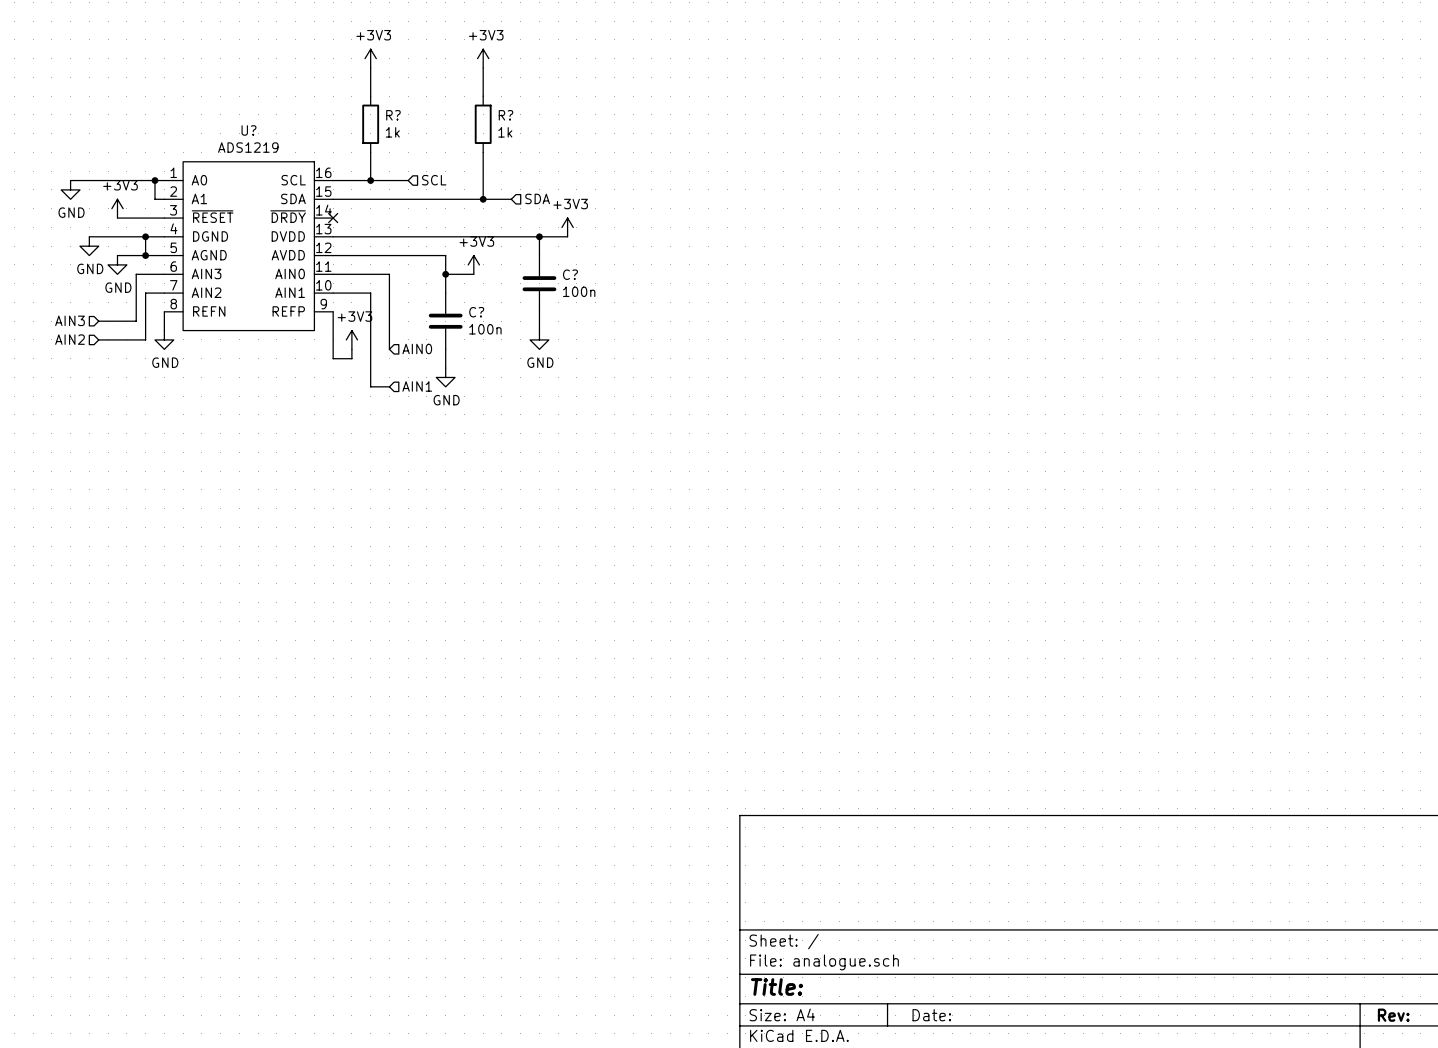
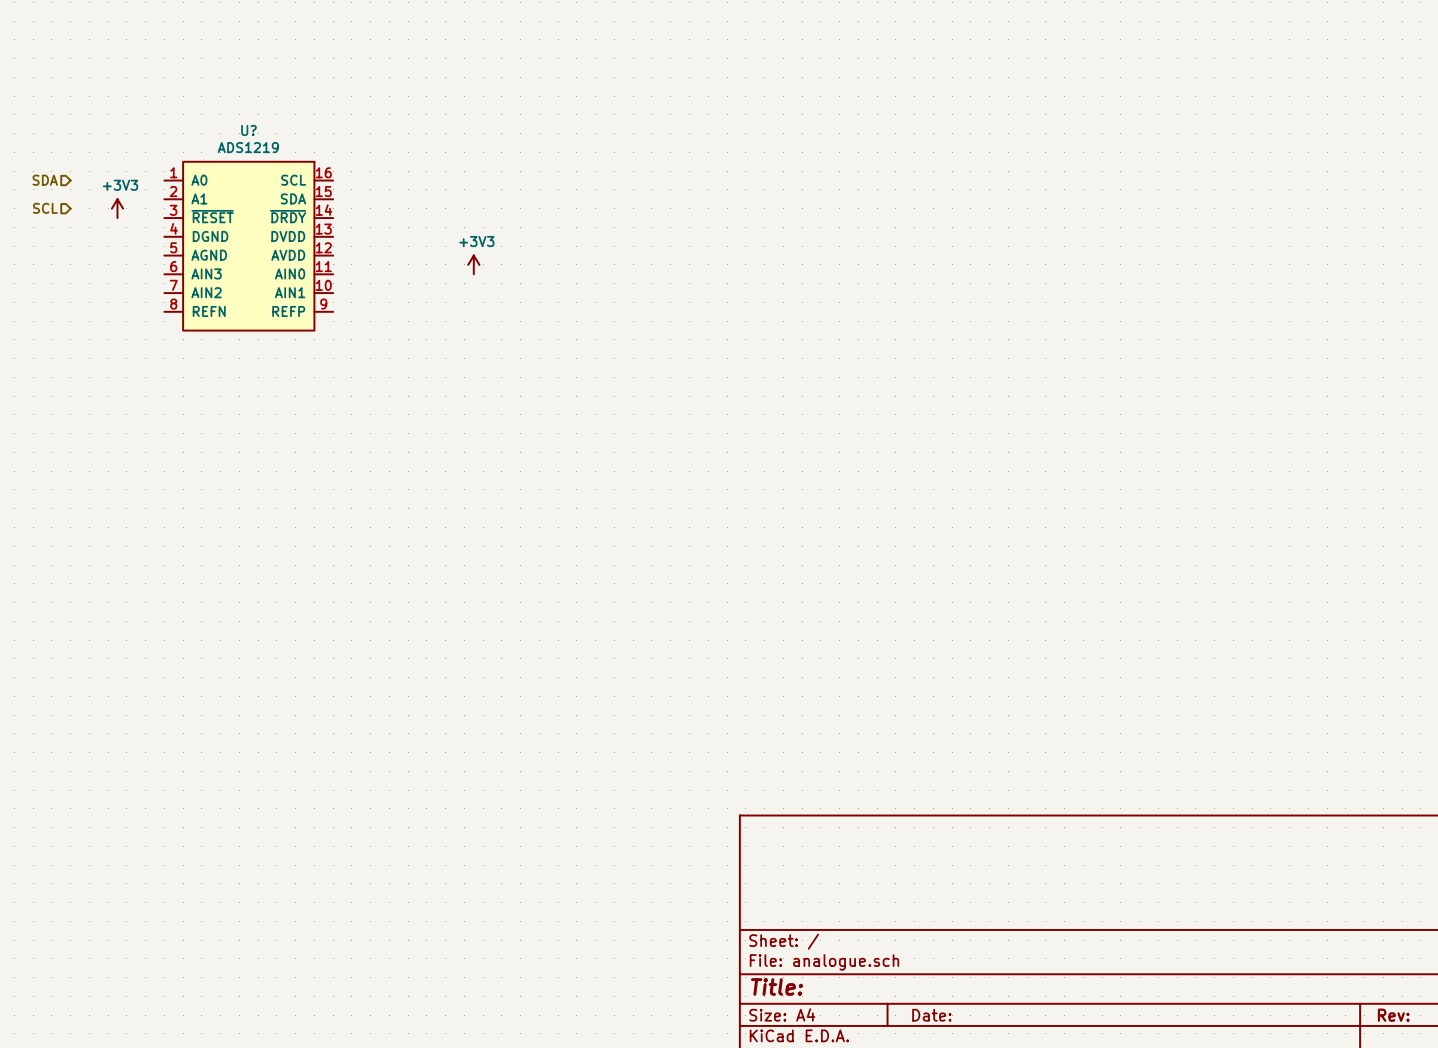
power symbol: +3V3 (370, 58) -> none
power symbol: +3V3 (483, 58) -> none
wire: (370, 68) (370, 96) -> none
wire: (483, 68) (483, 96) -> none
R?: 1k (370, 124) -> none
R?: 1k (483, 124) -> none
wire: (370, 152) (370, 180) -> none
wire: (483, 152) (483, 199) -> none
hierarchical label: none -> SDA (45, 180)
wire: (70, 180) (164, 180) -> none
wire: (154, 180) (154, 199) (164, 199) -> none
junction: (154, 180) -> none
wire: (333, 180) (408, 180) -> none
junction: (370, 180) -> none
hierarchical label: SCL (434, 180) -> none
power symbol: GND (70, 189) -> none
hierarchical label: SDA (537, 198) -> none
wire: (333, 199) (511, 199) -> none
junction: (483, 199) -> none
hierarchical label: none -> SCL (45, 208)
wire: (117, 218) (164, 218) -> none
no-connect mark: (333, 218) -> none
power symbol: +3V3 (567, 227) -> none
wire: (89, 236) (164, 236) -> none
wire: (145, 236) (145, 255) -> none
junction: (145, 236) -> none
wire: (333, 236) (567, 236) -> none
wire: (539, 236) (539, 255) -> none
junction: (539, 236) -> none
power symbol: GND (89, 246) -> none
wire: (117, 255) (164, 255) -> none
junction: (145, 255) -> none
wire: (333, 255) (445, 255) (445, 293) -> none
power symbol: GND (117, 264) -> none
wire: (164, 274) (136, 274) (136, 321) (98, 321) -> none
wire: (333, 274) (389, 274) (389, 349) -> none
wire: (445, 274) (473, 274) -> none
junction: (445, 274) -> none
C?: 100n (539, 283) -> none
wire: (164, 293) (145, 293) (145, 339) (98, 339) -> none
wire: (333, 293) (370, 293) (370, 386) (389, 386) -> none
wire: (164, 311) (164, 330) -> none
wire: (333, 311) (333, 358) (351, 358) (351, 349) -> none
wire: (539, 311) (539, 330) -> none
hierarchical label: AIN3 (70, 320) -> none
C?: 100n (445, 321) -> none
hierarchical label: AIN2 (70, 339) -> none
power symbol: GND (164, 339) -> none
power symbol: +3V3 (351, 339) -> none
power symbol: GND (539, 339) -> none
hierarchical label: AIN0 (417, 348) -> none
wire: (445, 349) (445, 368) -> none
power symbol: GND (445, 377) -> none
hierarchical label: AIN1 (417, 386) -> none

